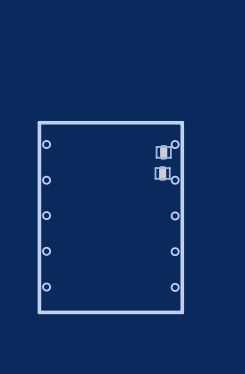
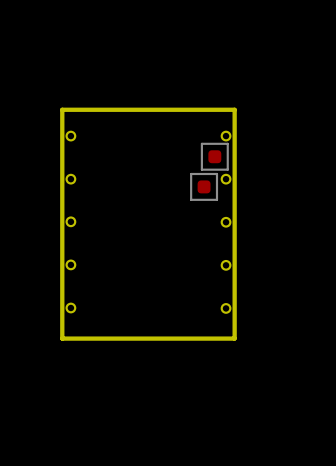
part: (163, 152) -> none
part: none -> (214, 156)
part: (162, 173) -> none
part: none -> (204, 186)

